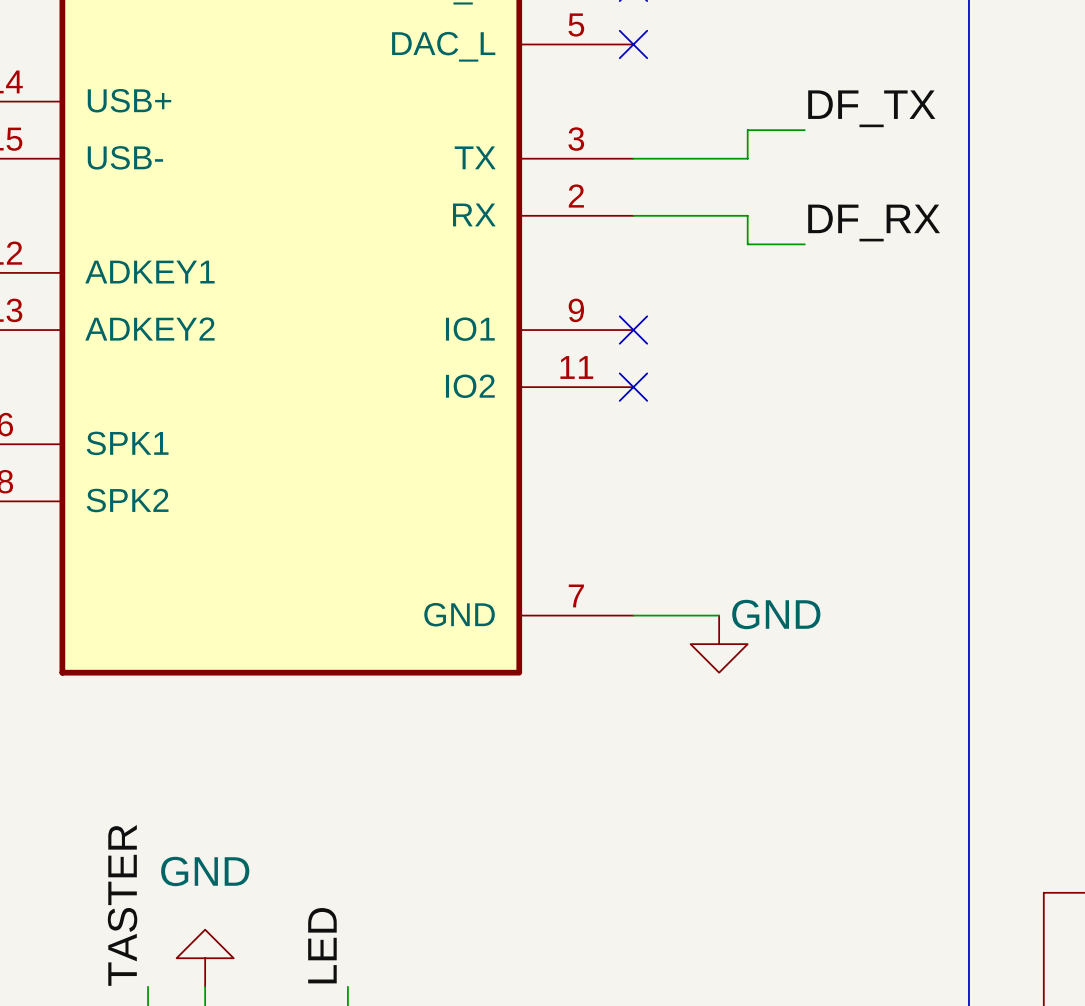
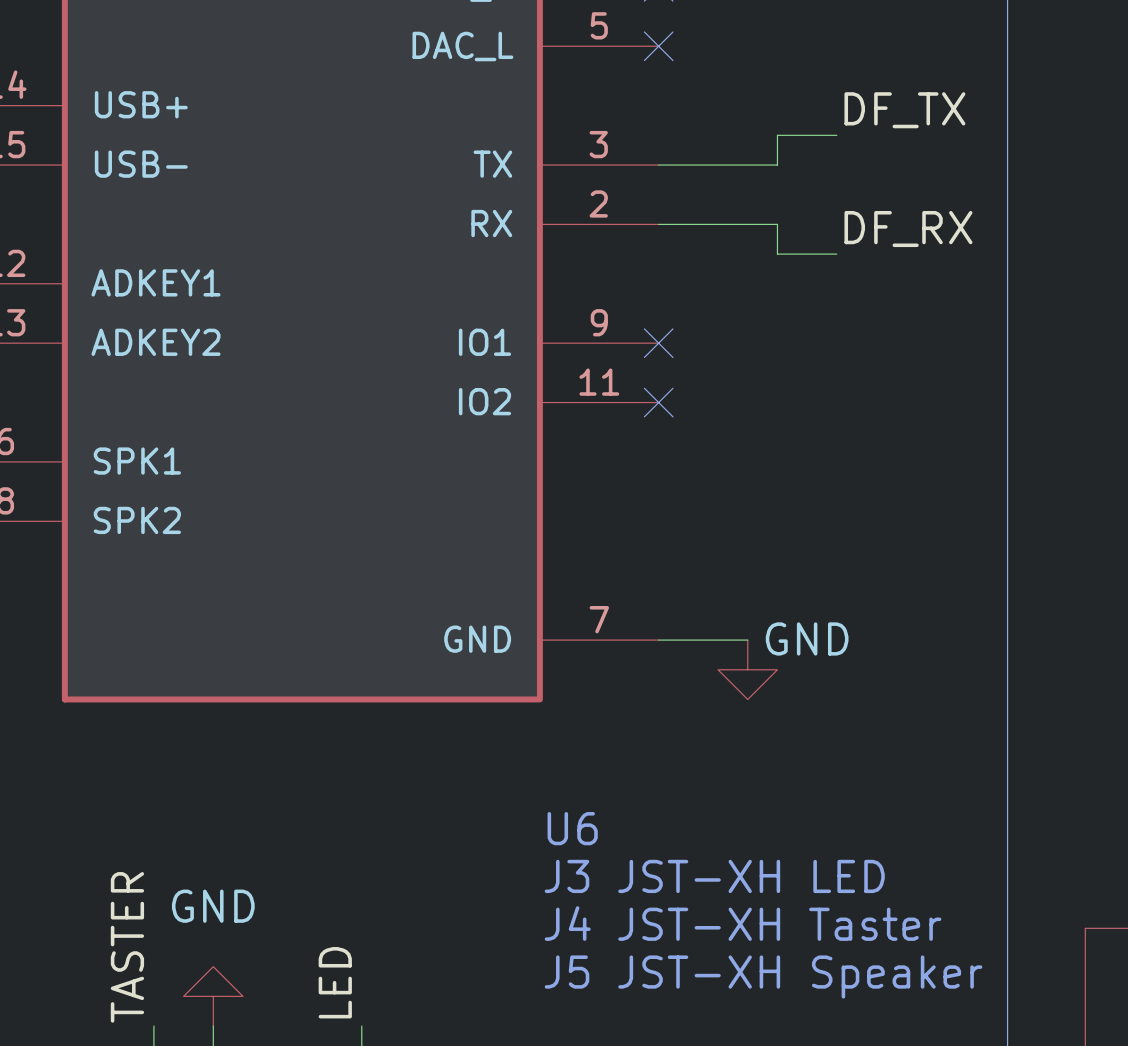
text: none -> U6 (572, 828)
text: none -> J3 JST-XH LED (714, 876)
text: none -> J4 JST-XH Taster (743, 923)
text: none -> J5 JST-XH Speaker (763, 977)

